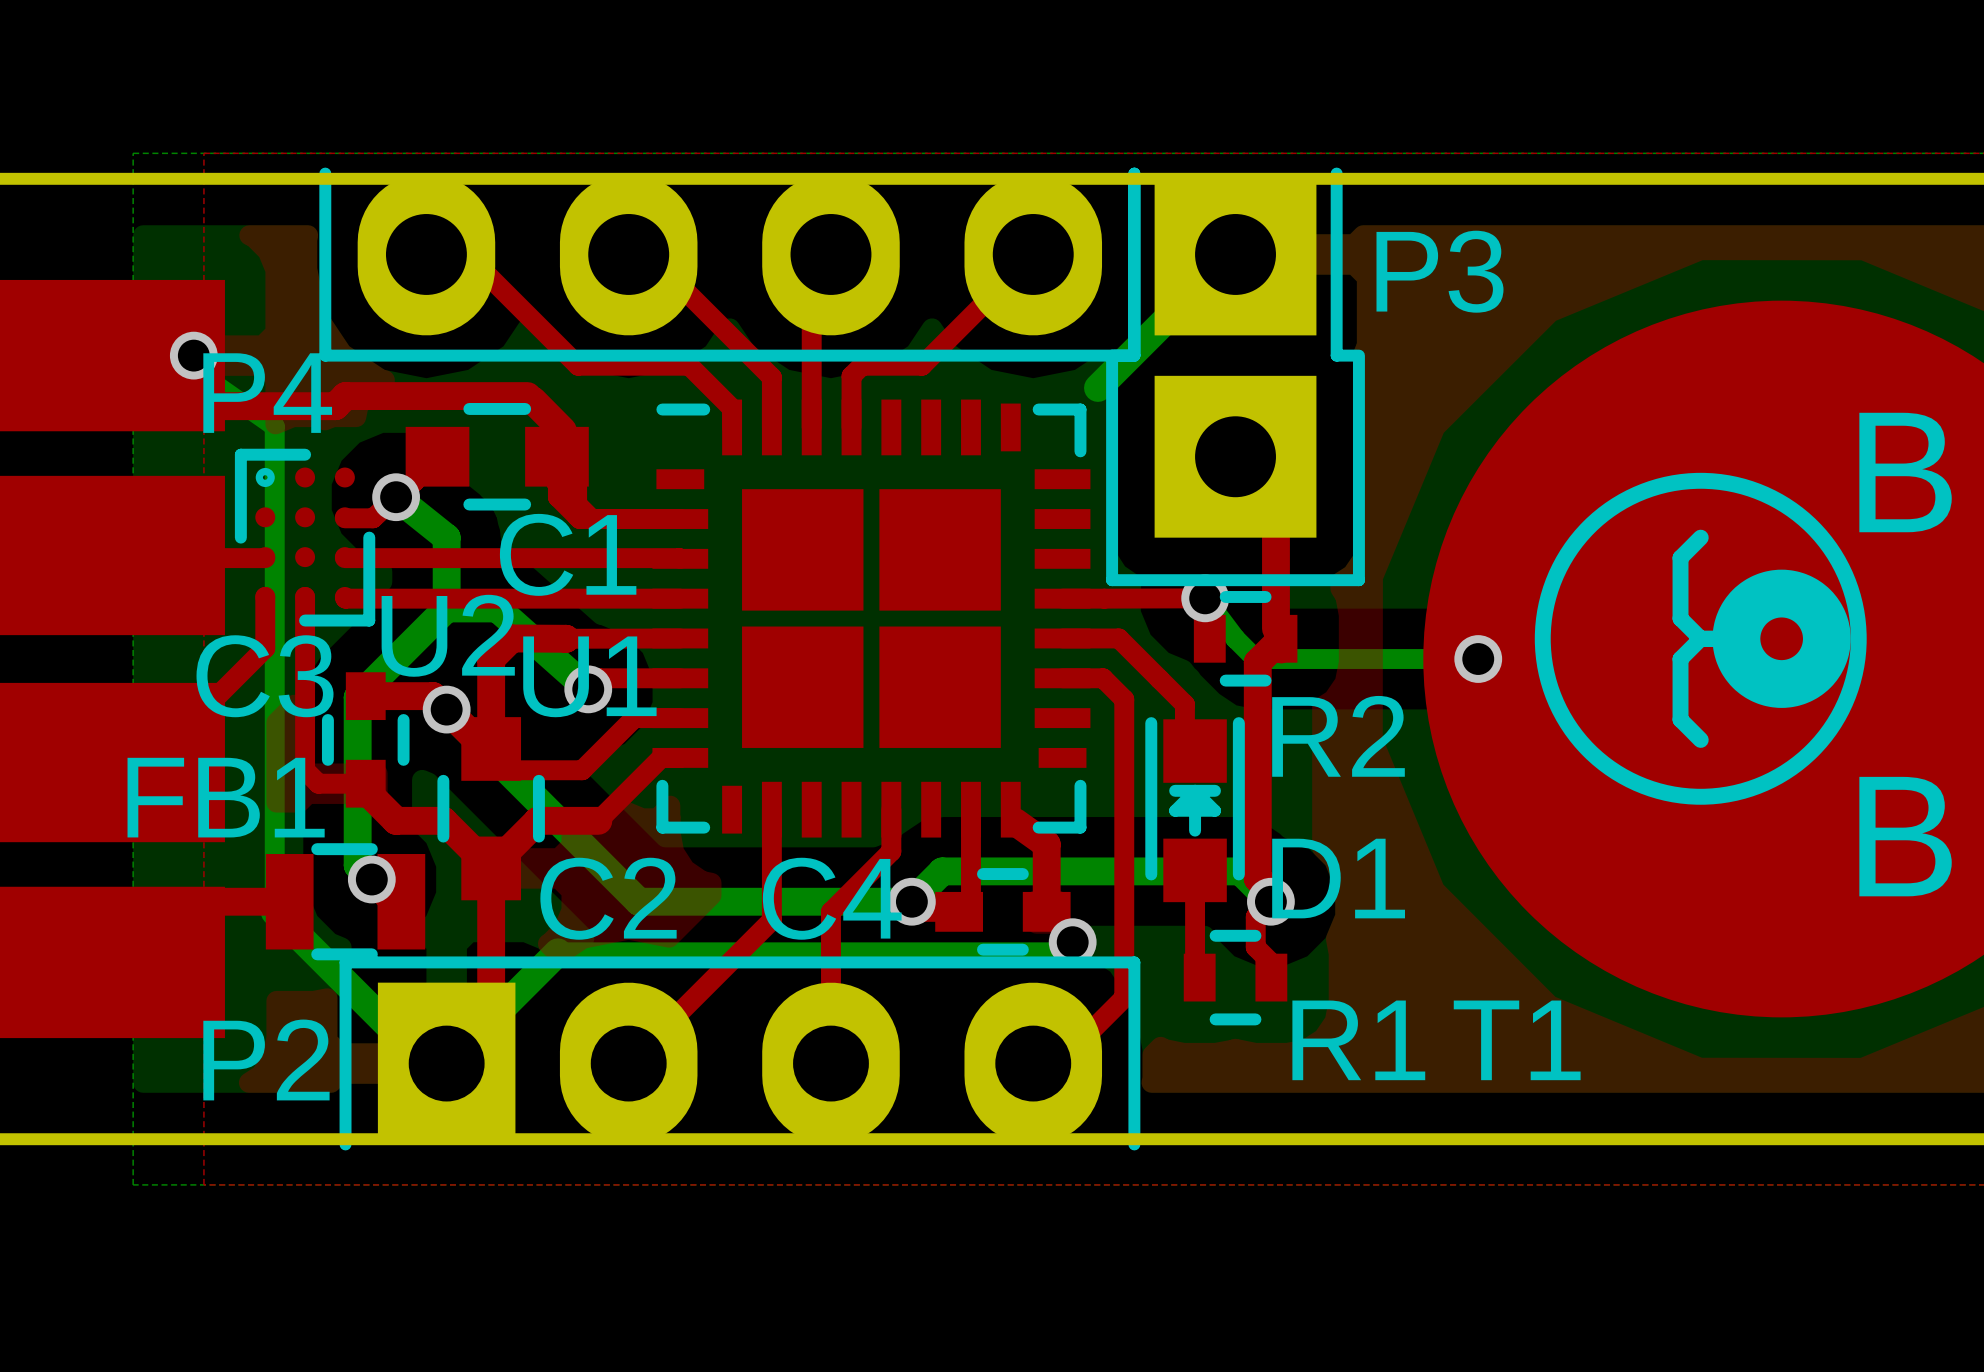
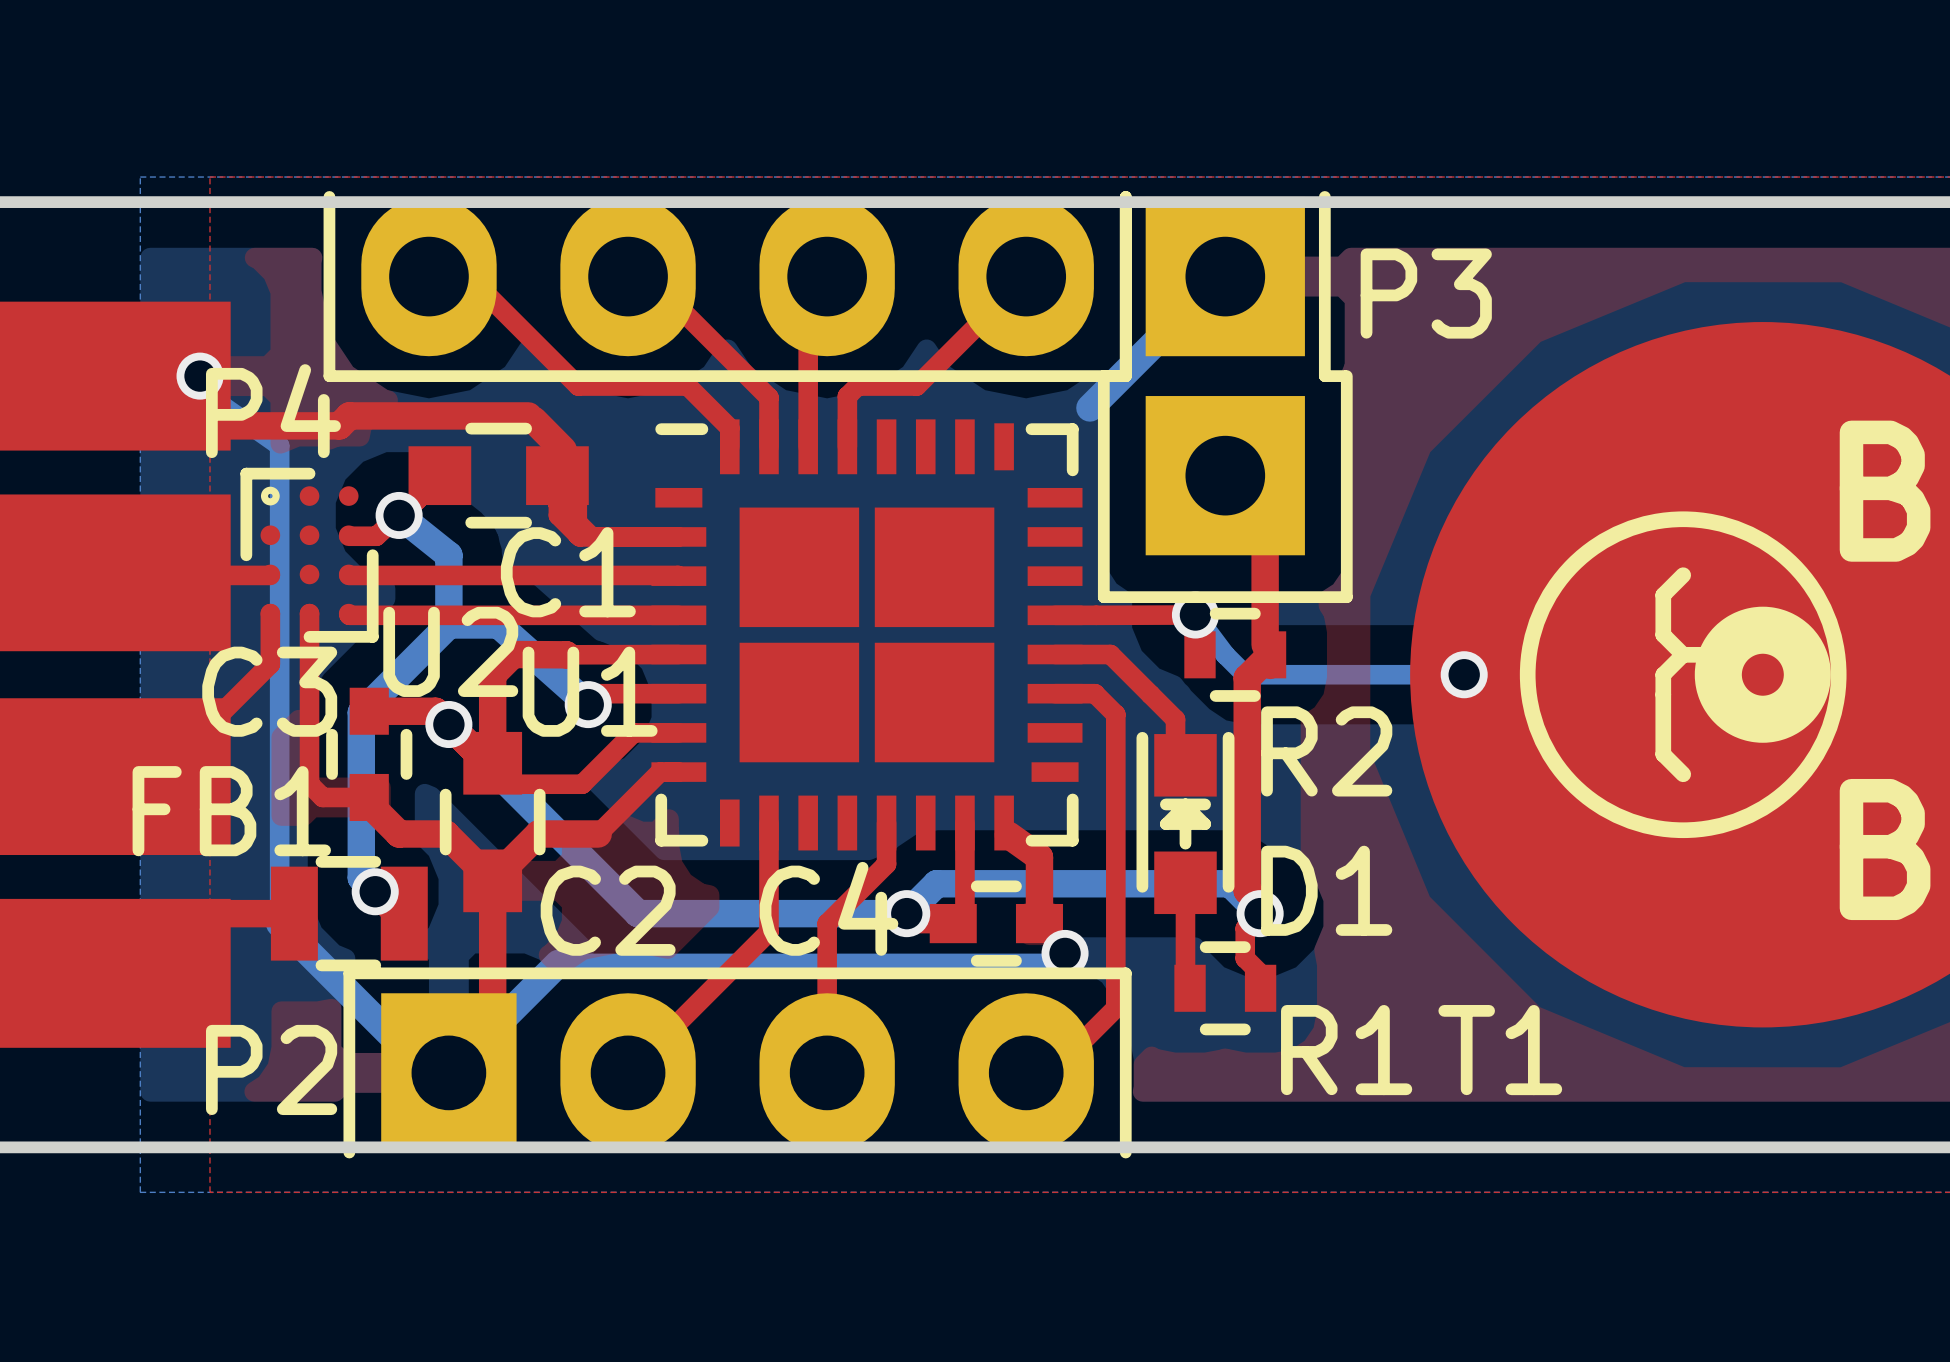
line: (1700, 537) (1680, 557) (1680, 578) -> (1683, 575) (1663, 595)
drawing position: (1700, 638) -> (1683, 674)
drawing position: (1781, 638) -> (1762, 674)
line: (1680, 719) (1700, 739) -> (1663, 734) (1663, 754) (1683, 774)

